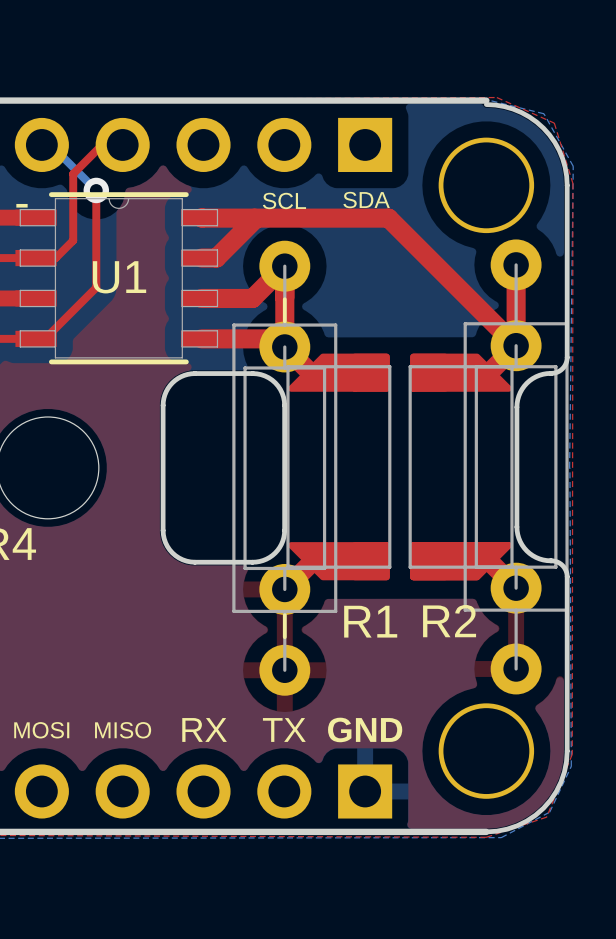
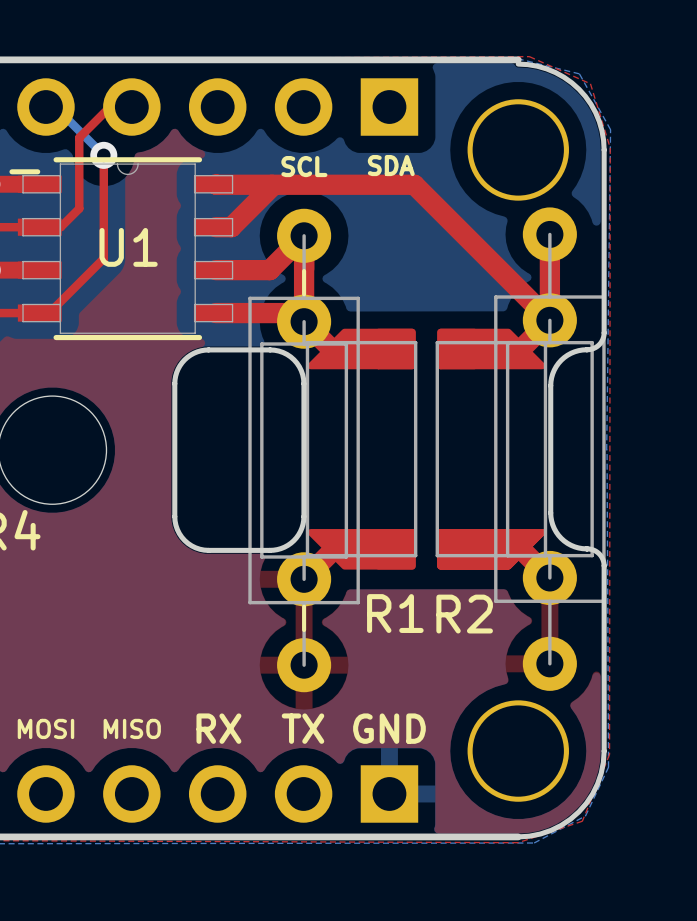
R2 name position: R2 (449, 621) -> R2 (464, 614)

